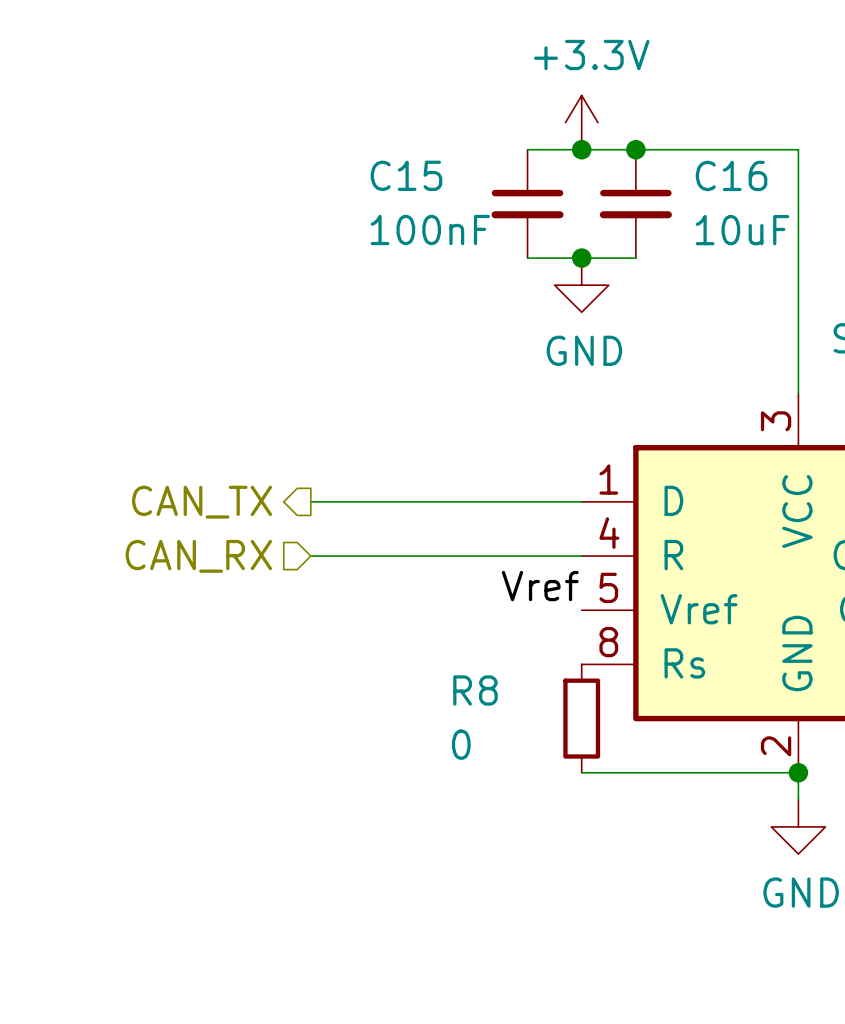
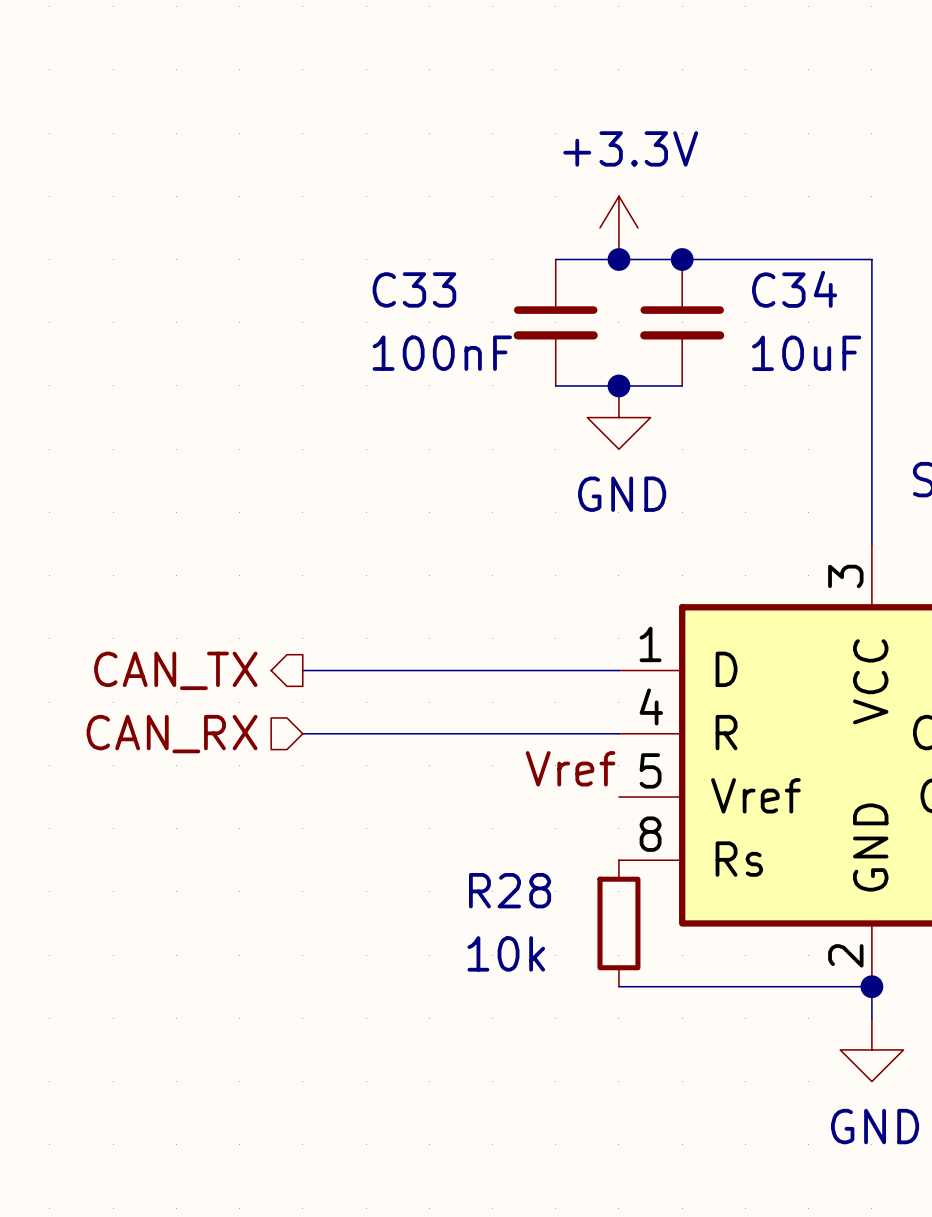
C15 name: C15 (406, 175) -> C33 (414, 289)
C16 name: C16 (731, 175) -> C34 (794, 289)
R8 name: R8 (475, 690) -> R28 (510, 890)
R8 value: 0 (461, 744) -> 10k (506, 953)

